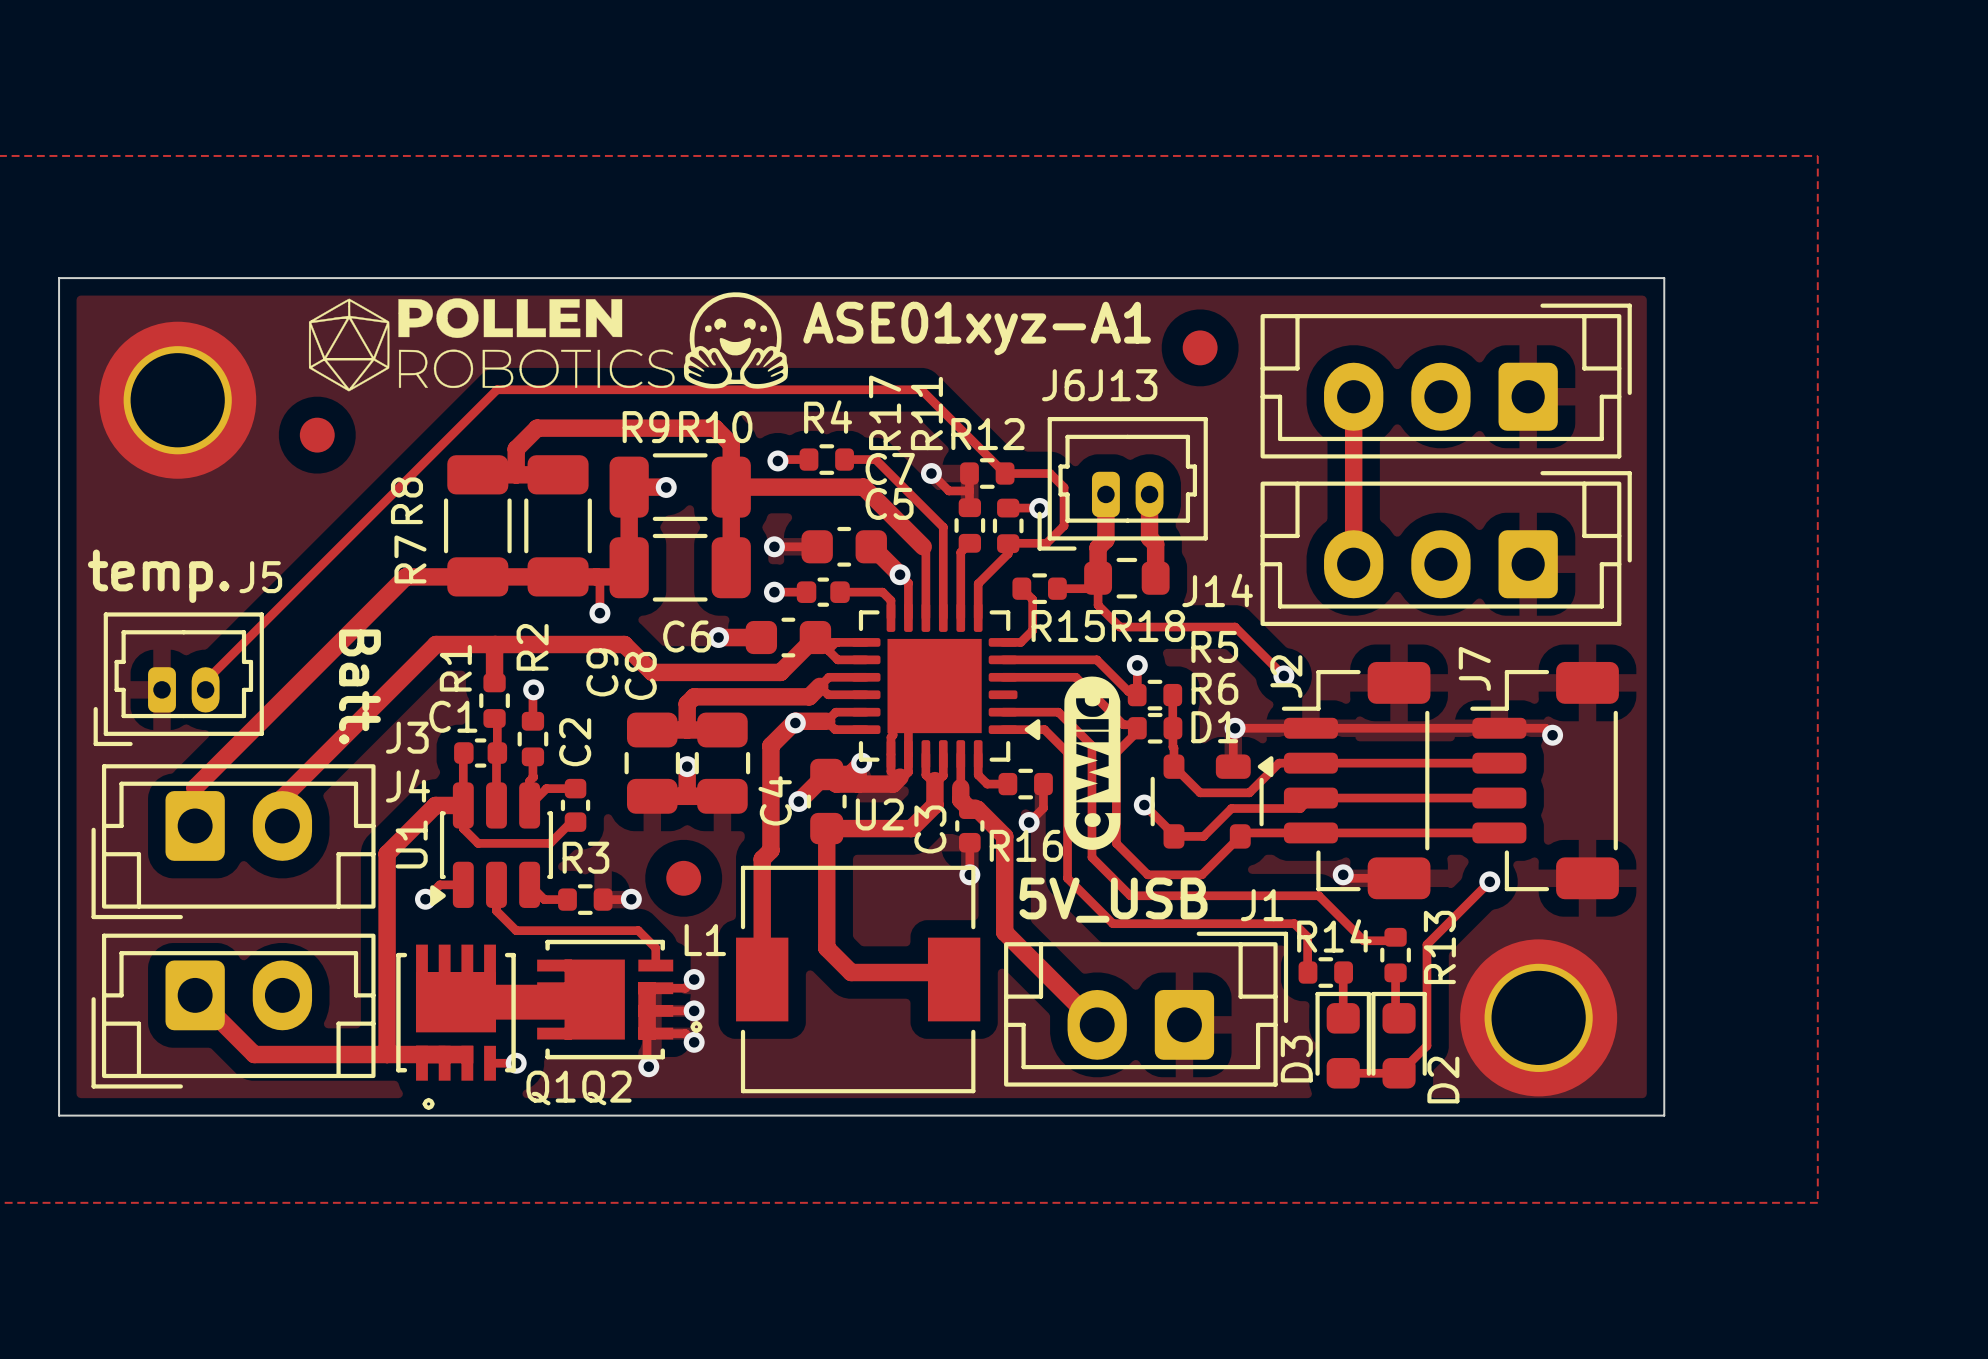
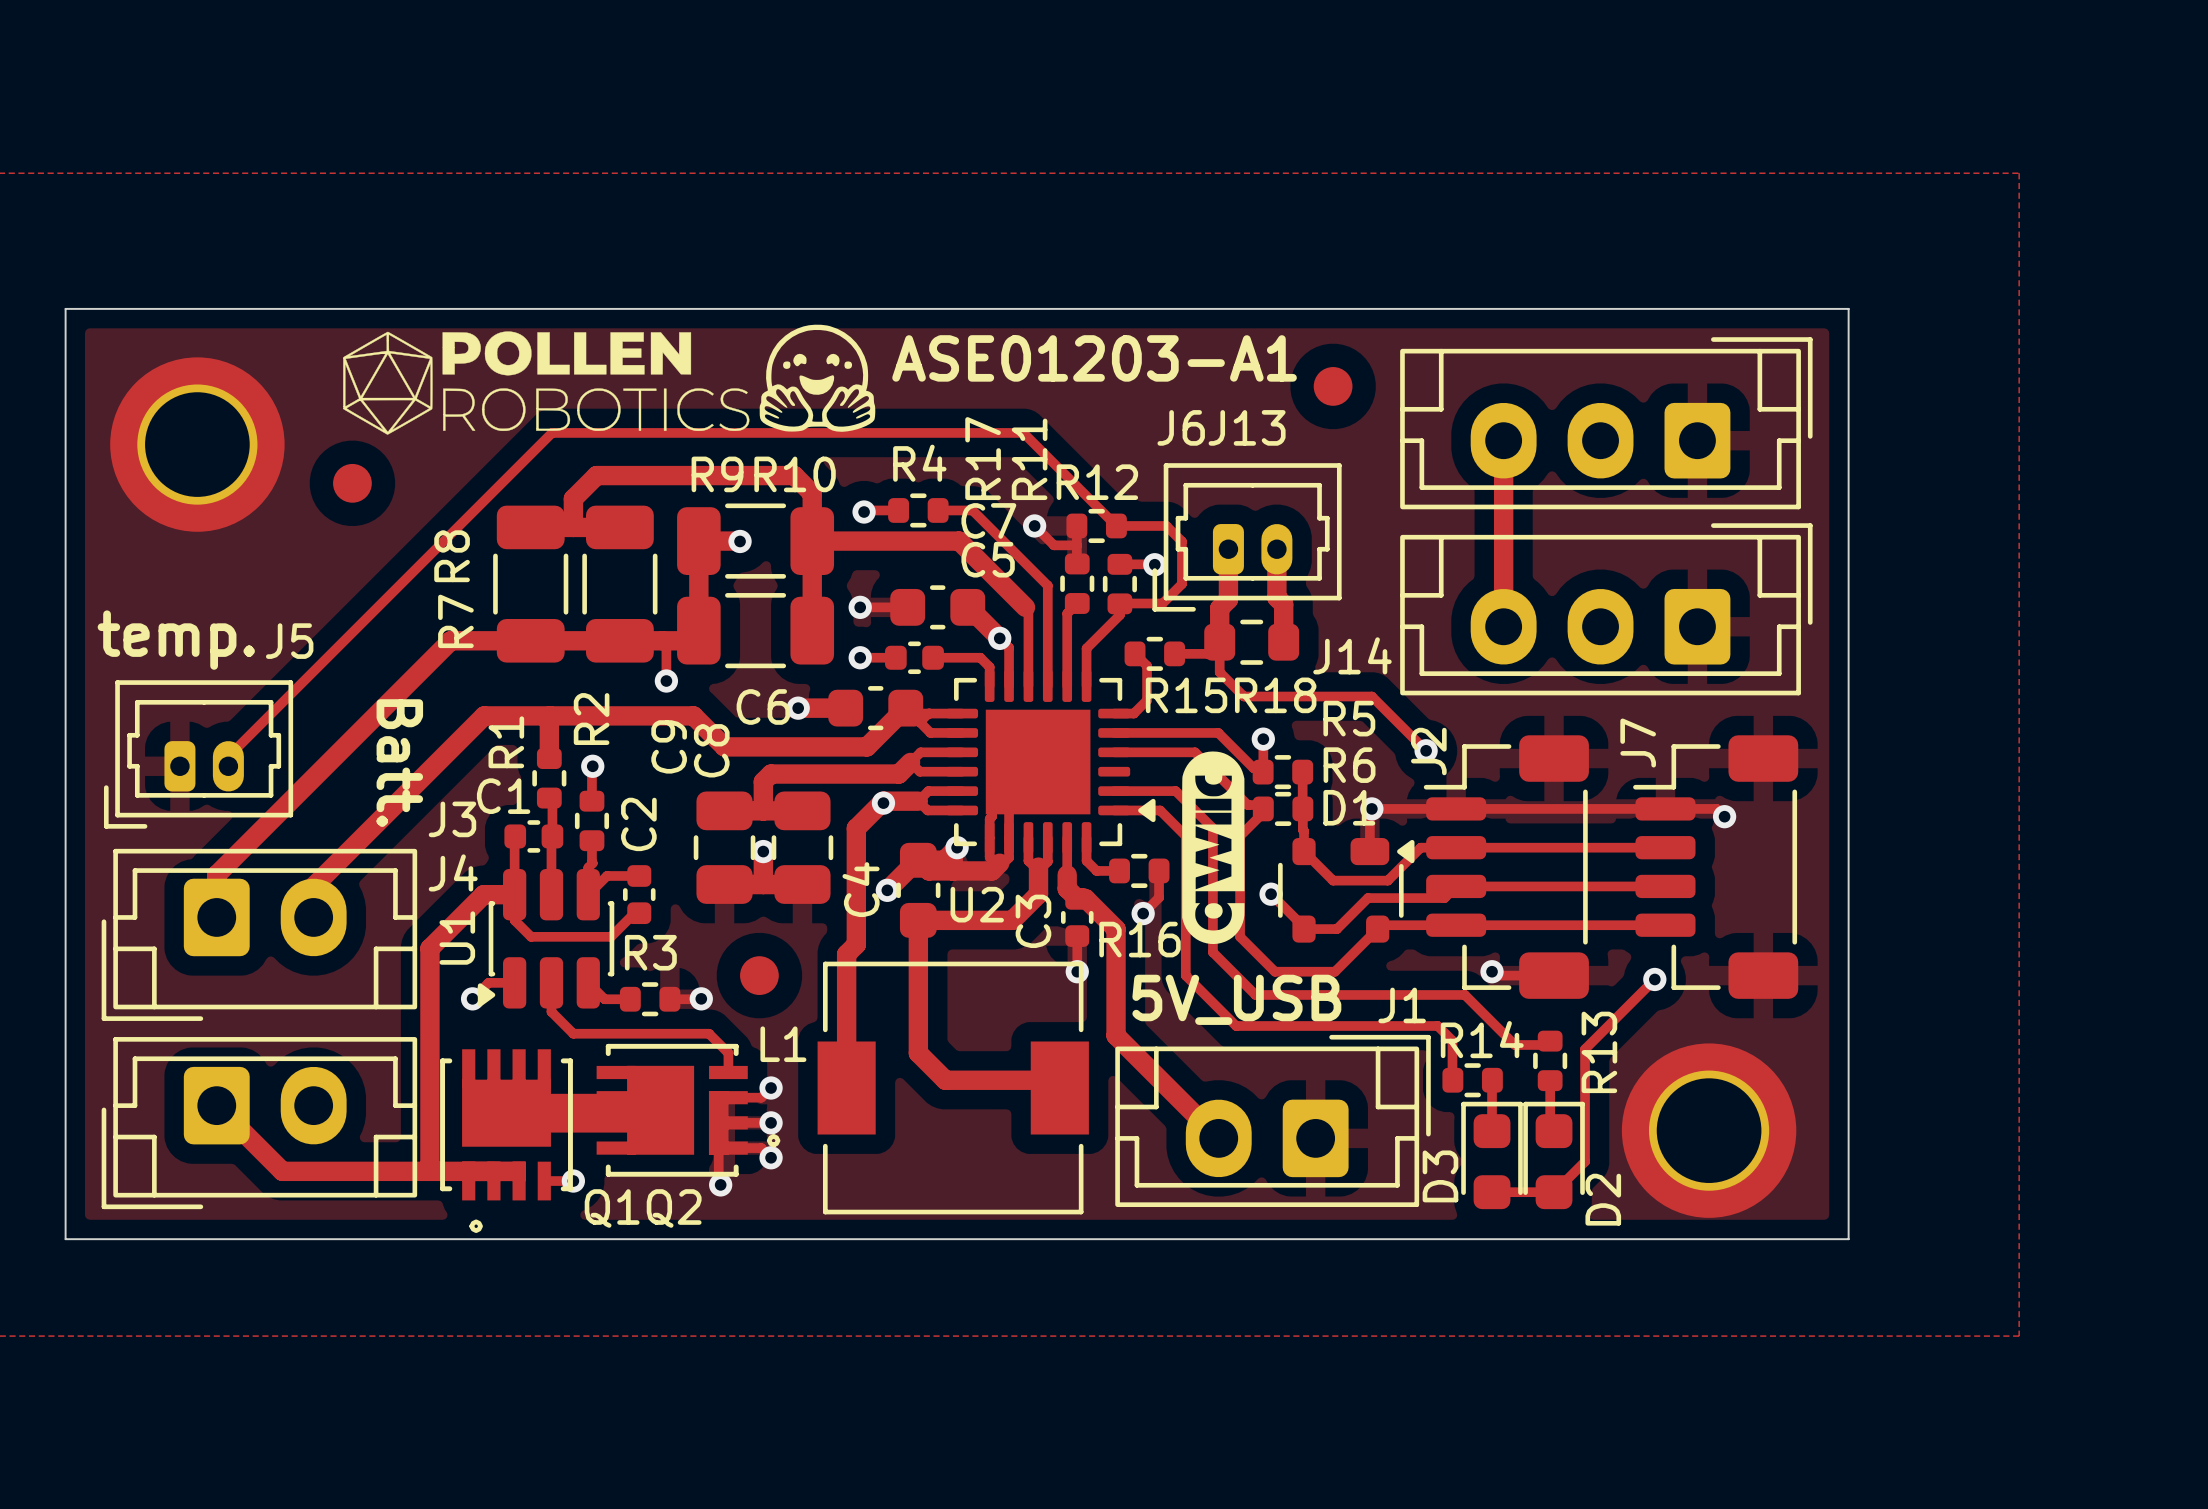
text: ASE01xyz-A1 (977, 328) -> ASE01203-A1 (1094, 358)

